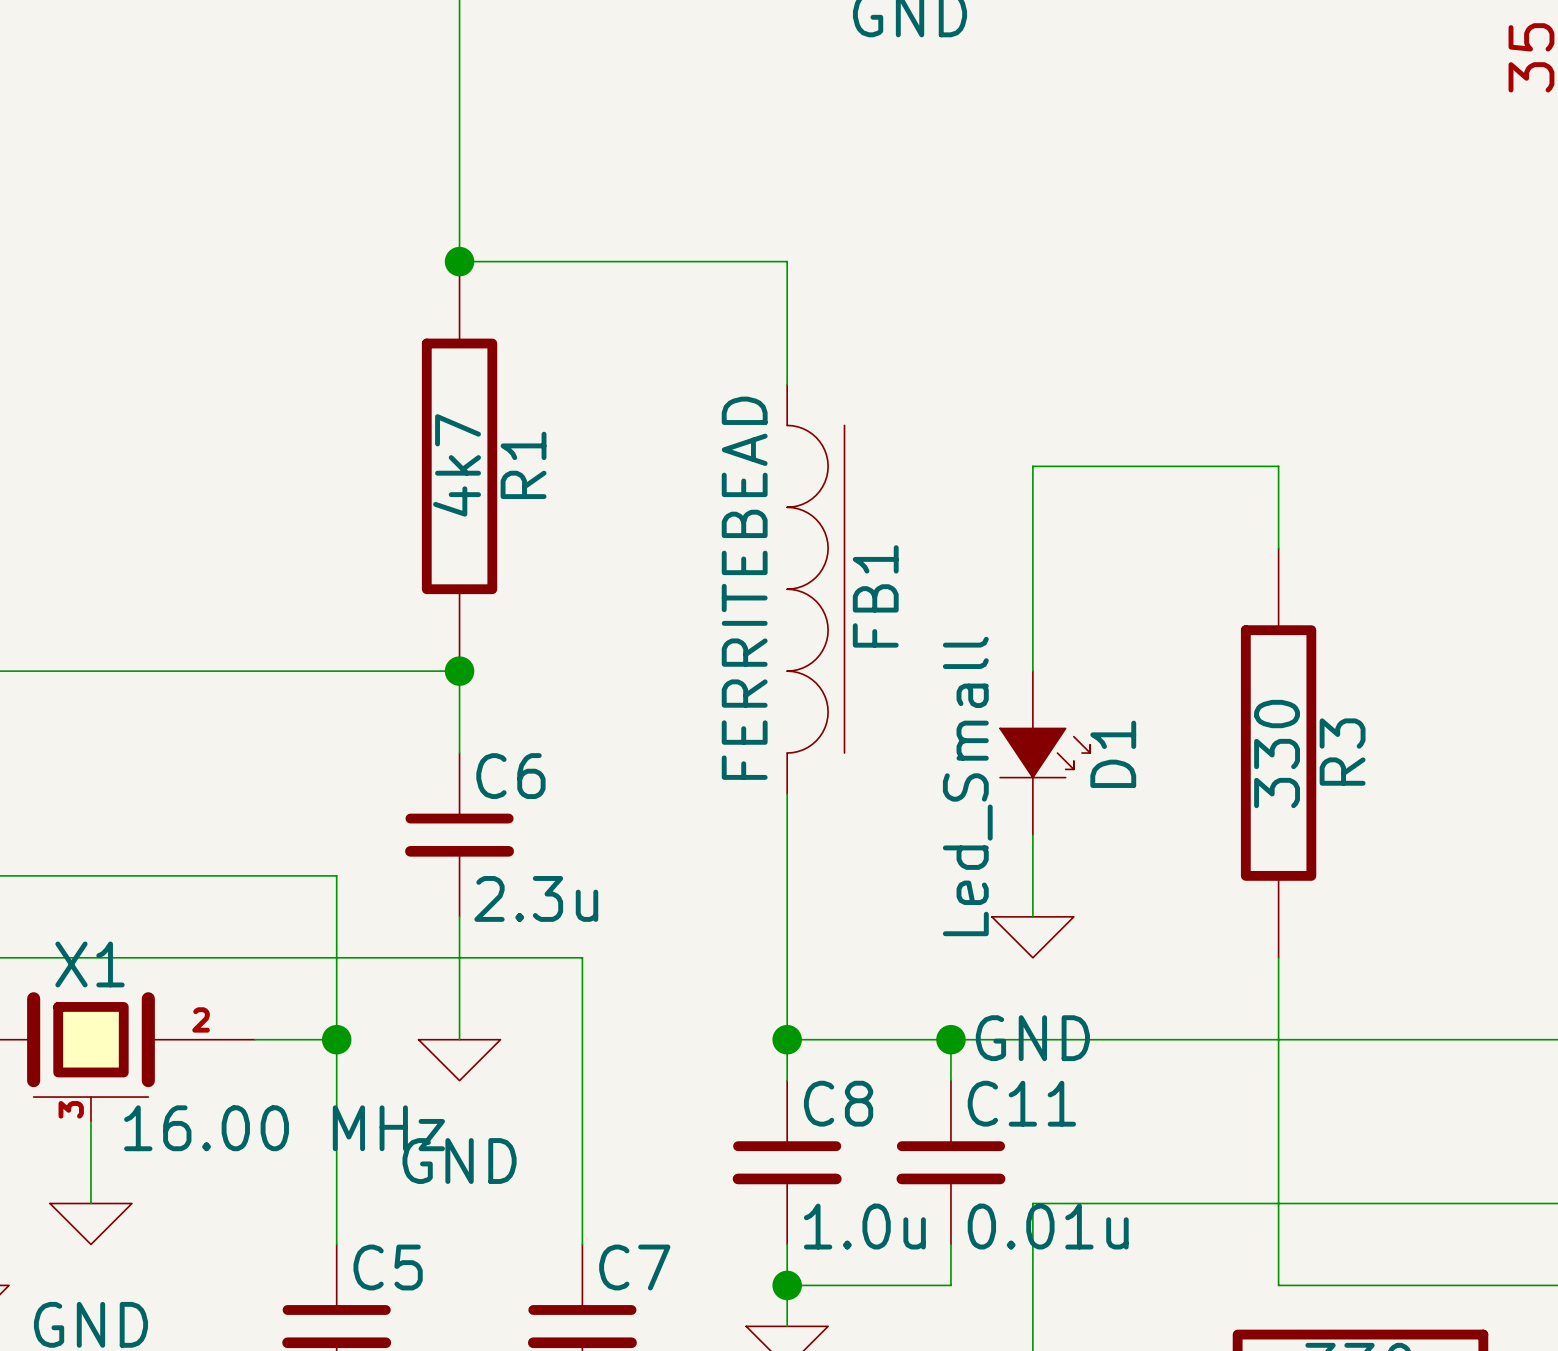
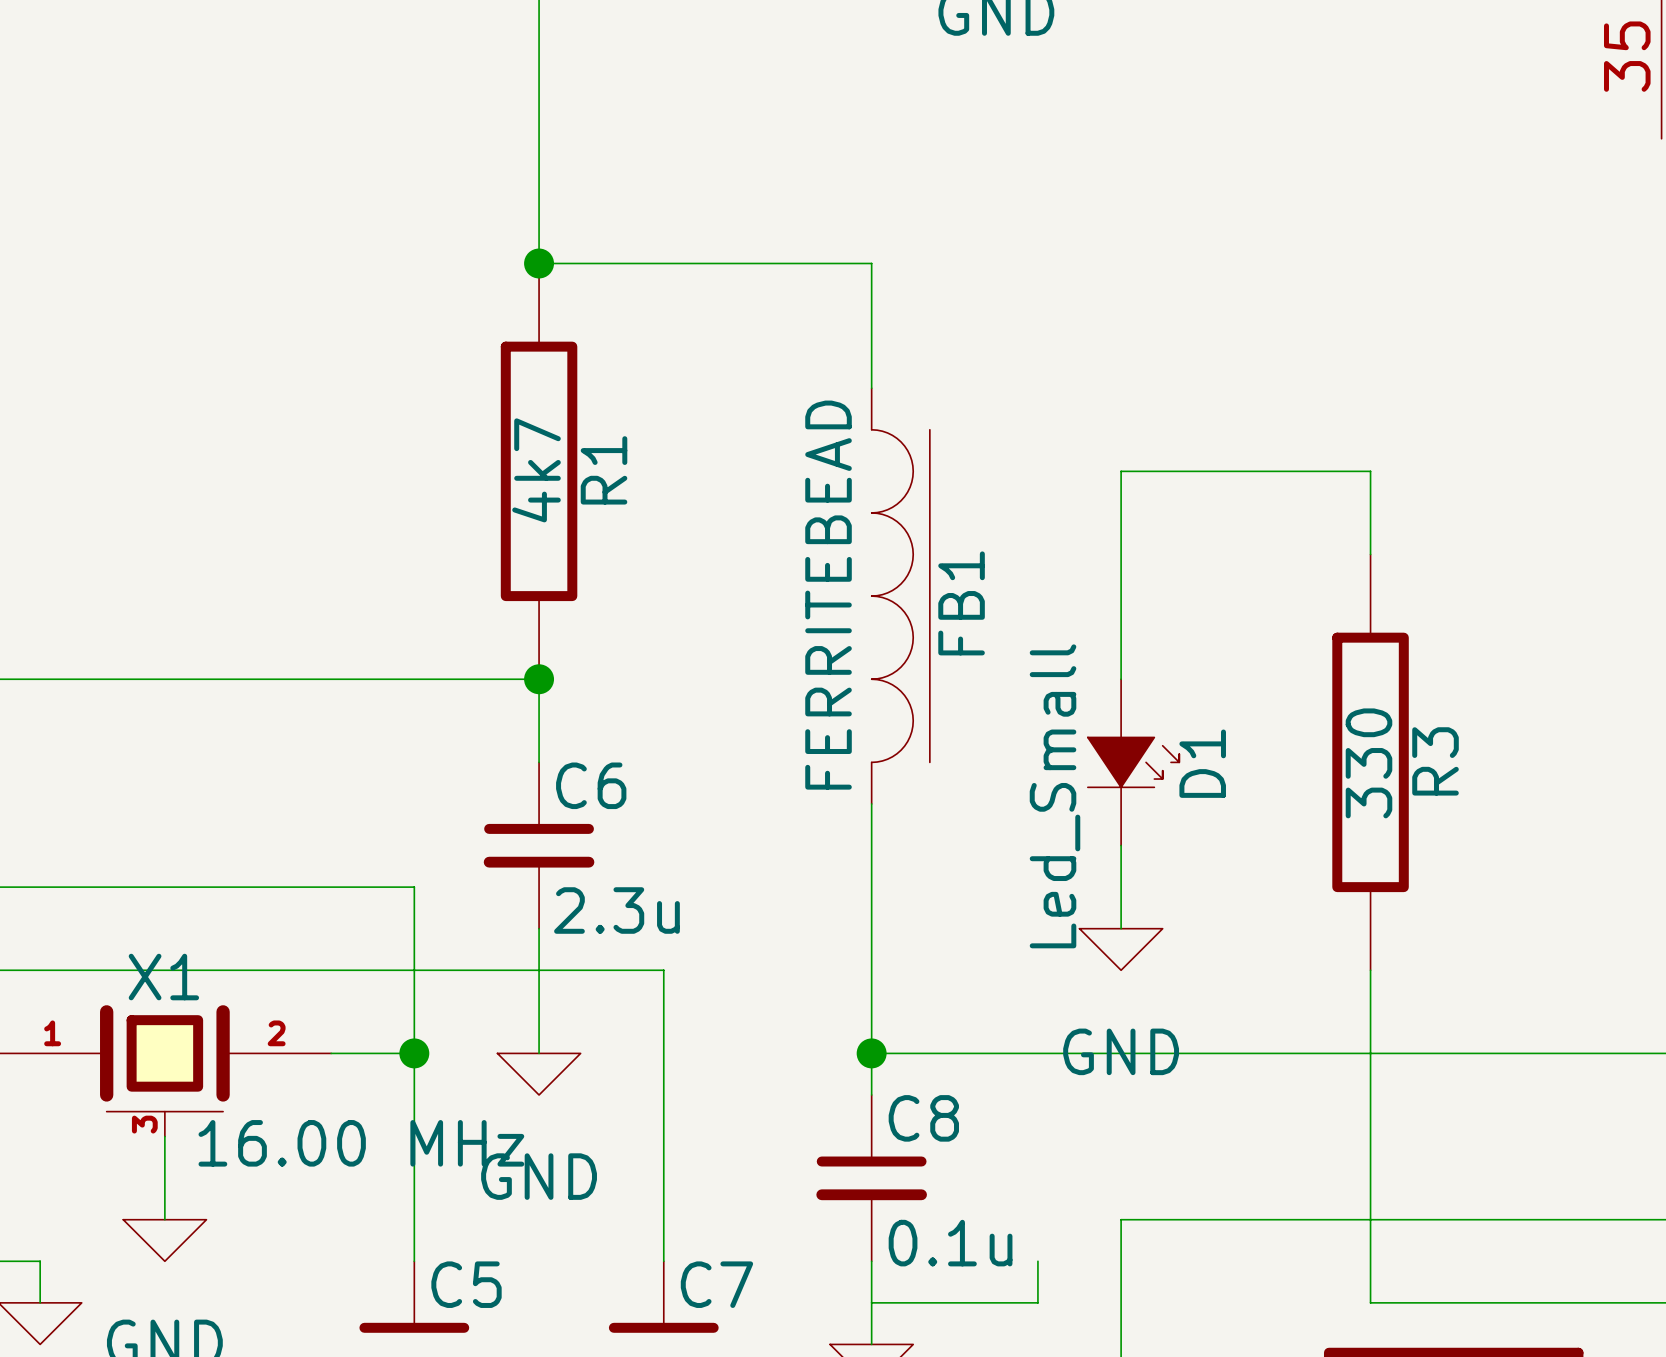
wire: (950, 1039) (950, 1080) -> none
junction: (950, 1039) -> none
C11: 0.01u (950, 1162) -> none
C8 value: 1.0u (864, 1226) -> 0.1u (950, 1243)
junction: (787, 1285) -> none

